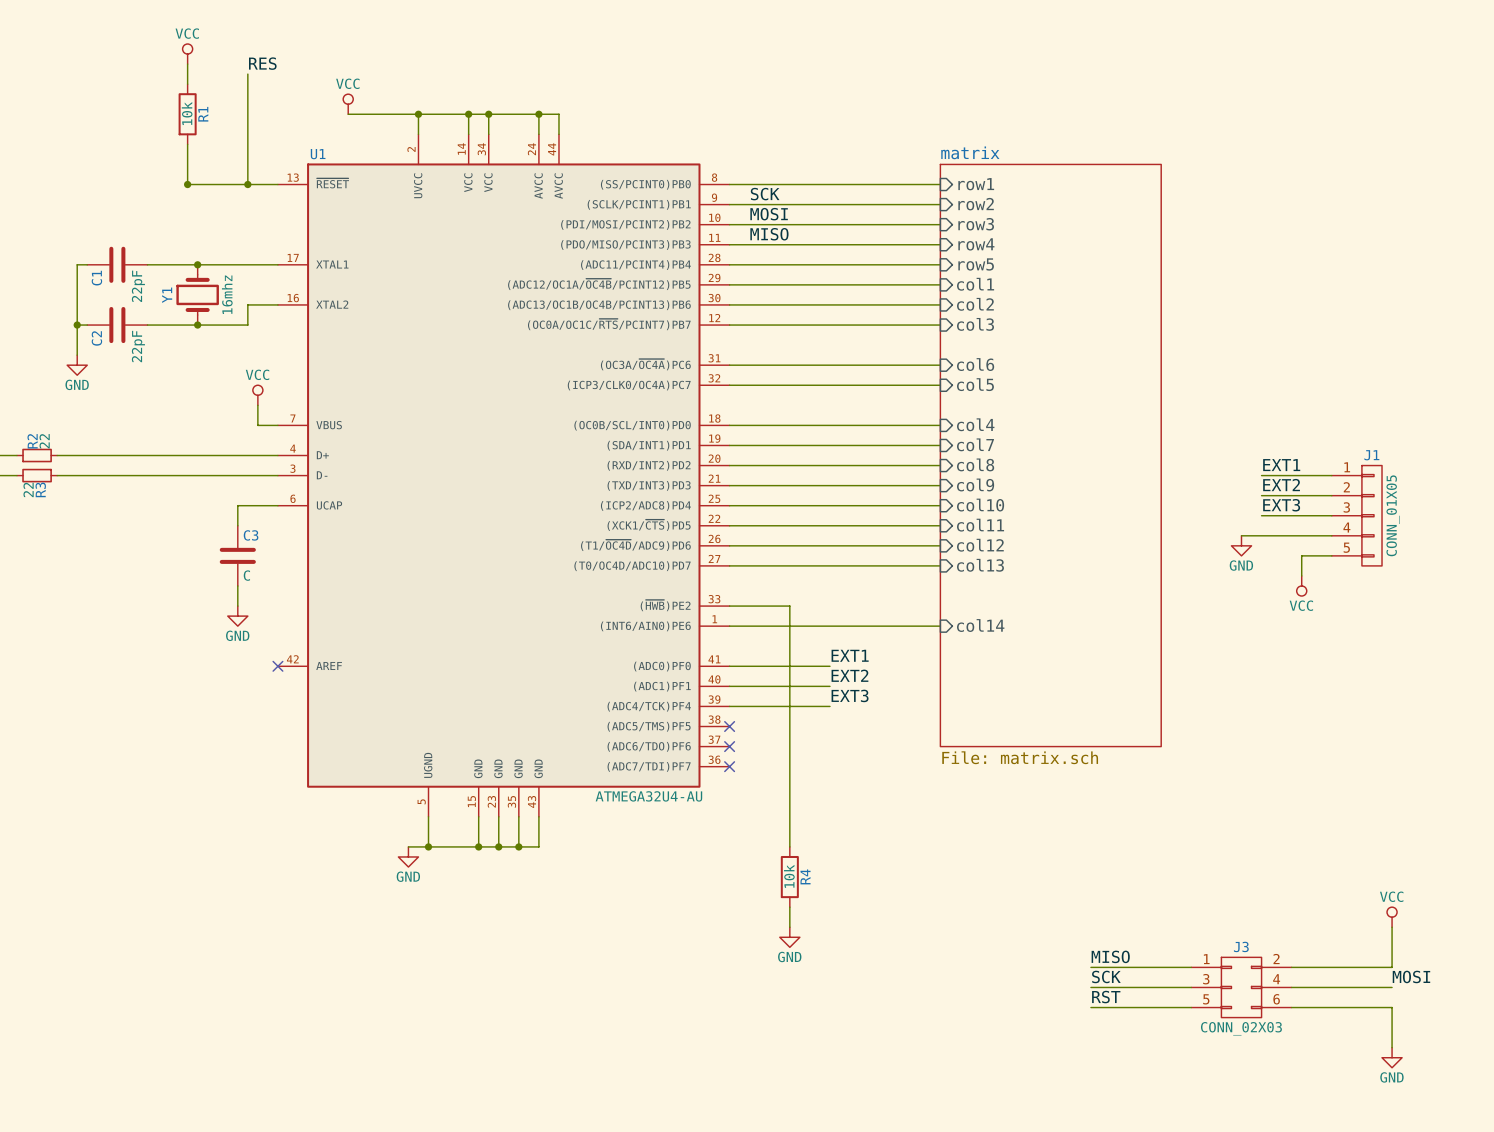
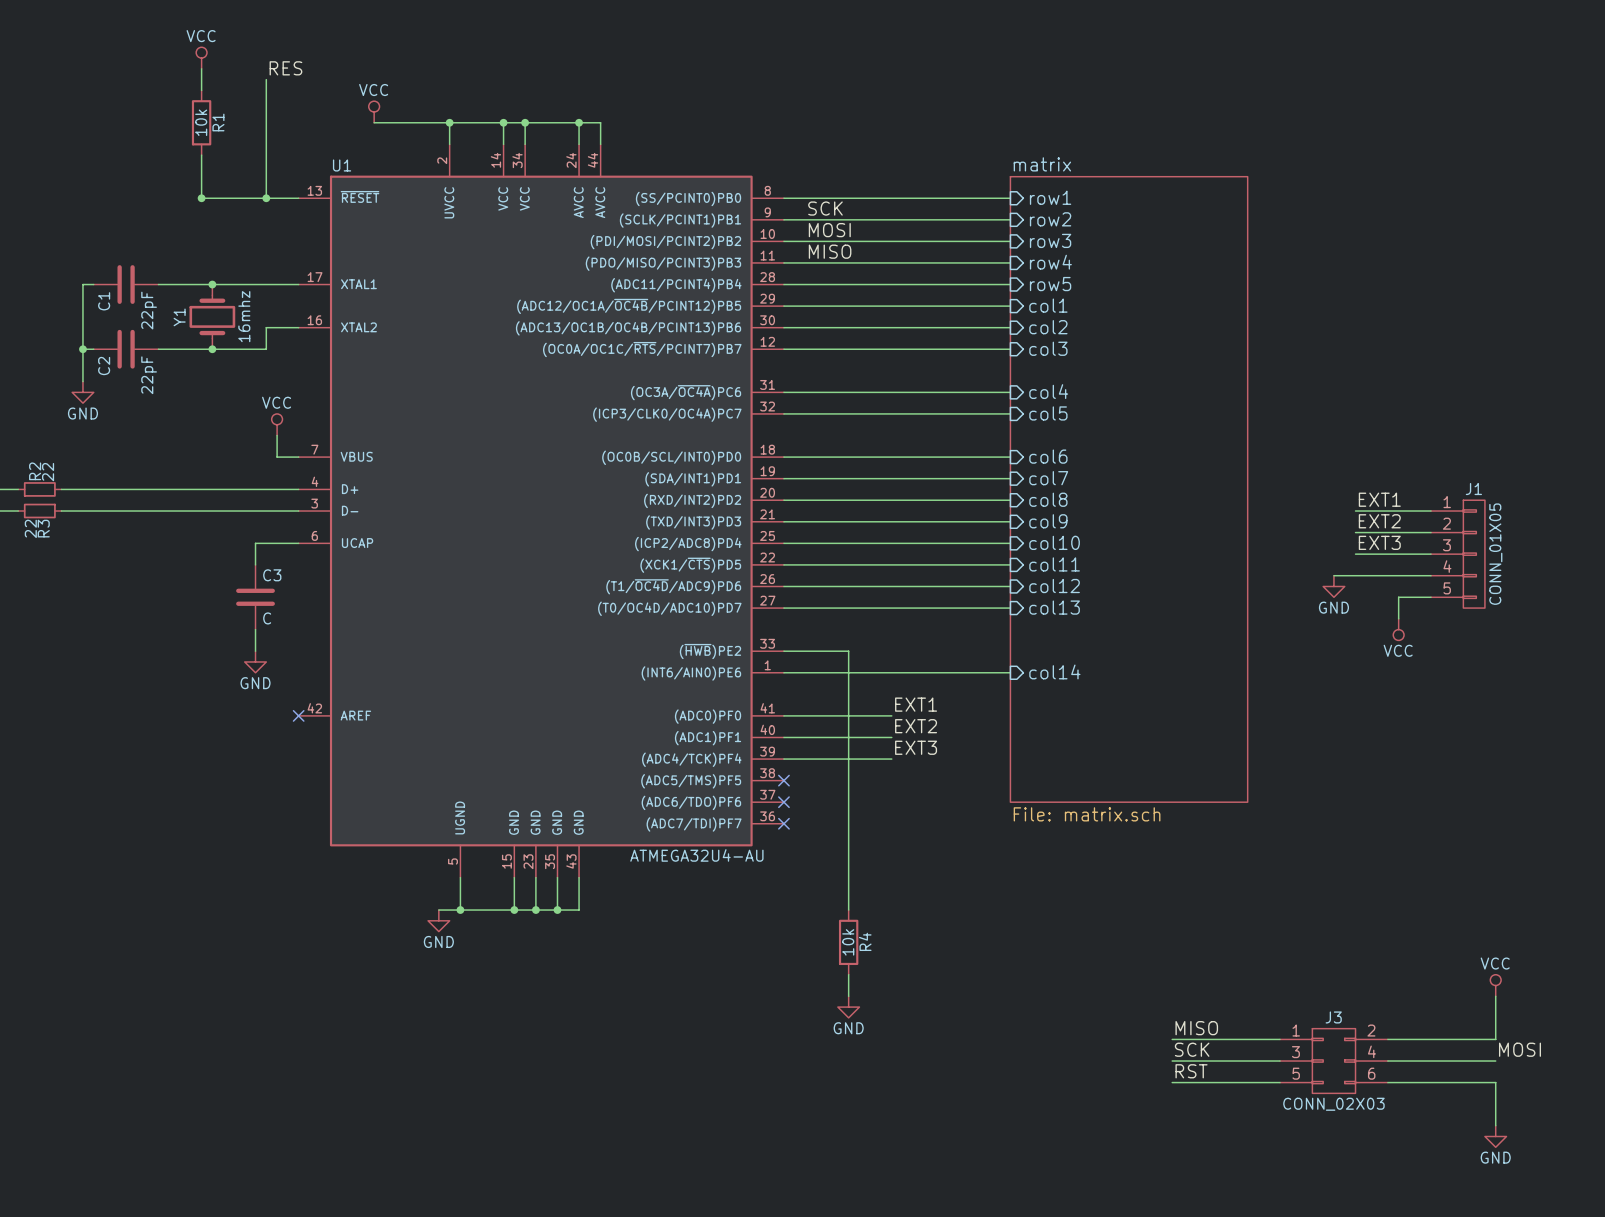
sheet pin: col6 (975, 364) -> col4 (1048, 391)
sheet pin: col4 (975, 424) -> col6 (1048, 456)

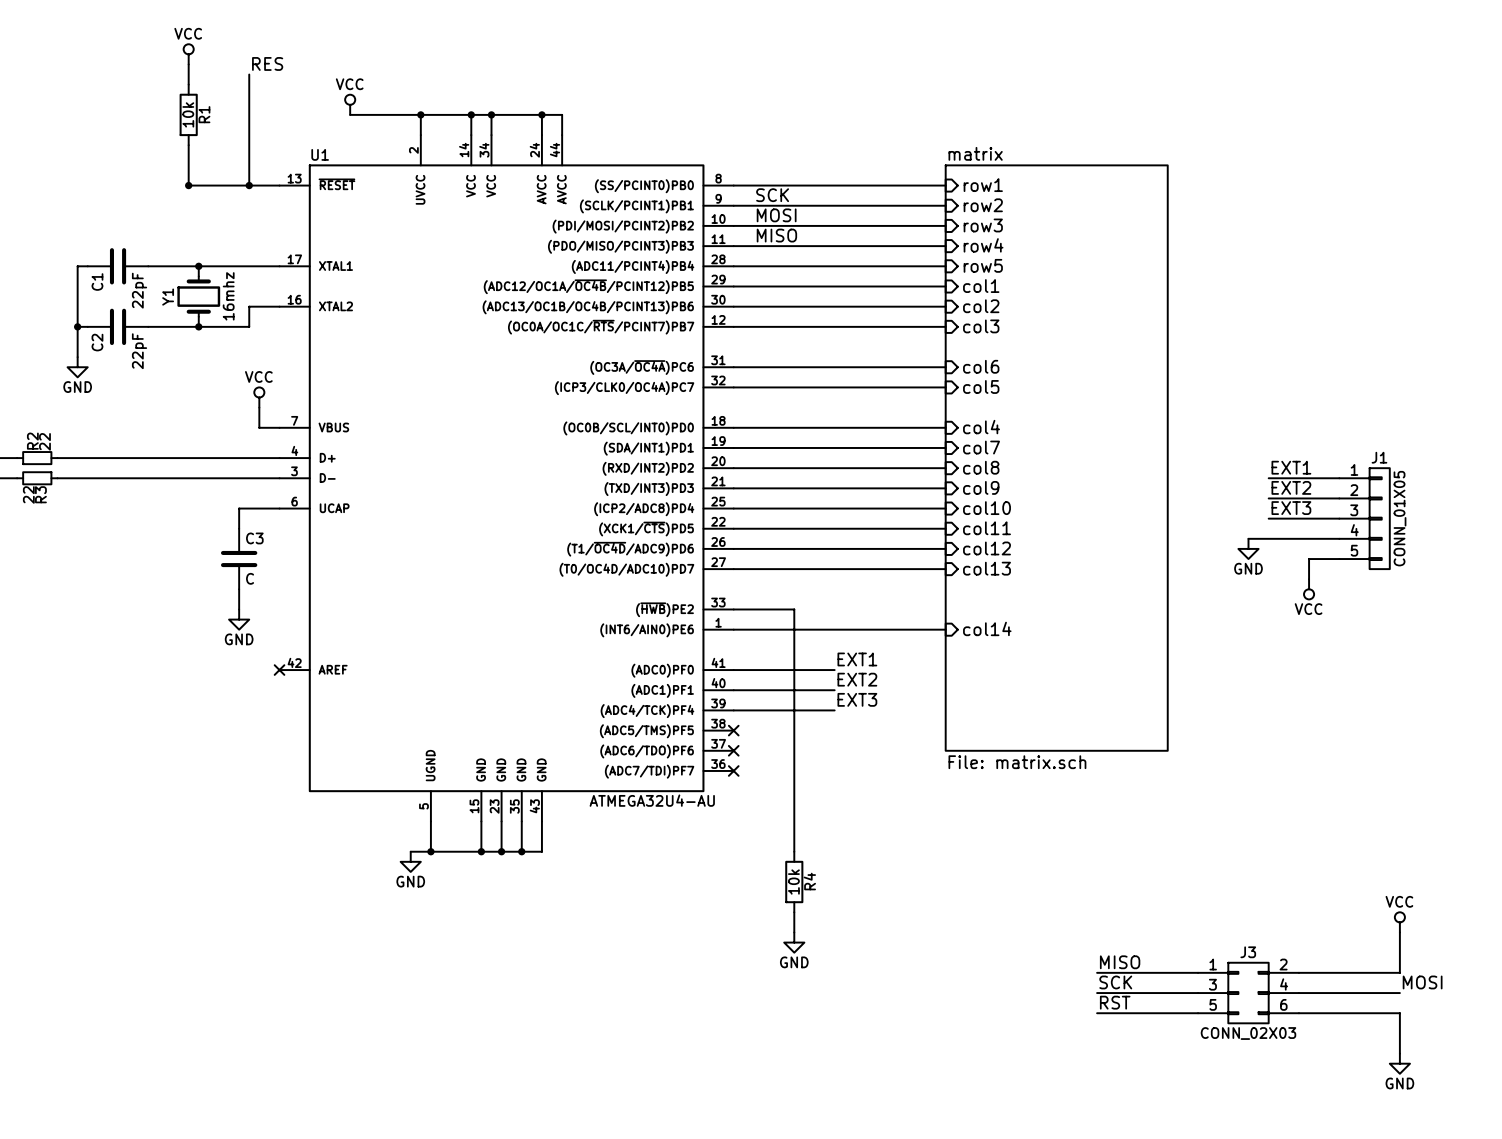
sheet pin: col4 (1048, 391) -> col6 (981, 366)
sheet pin: col6 (1048, 456) -> col4 (981, 427)

